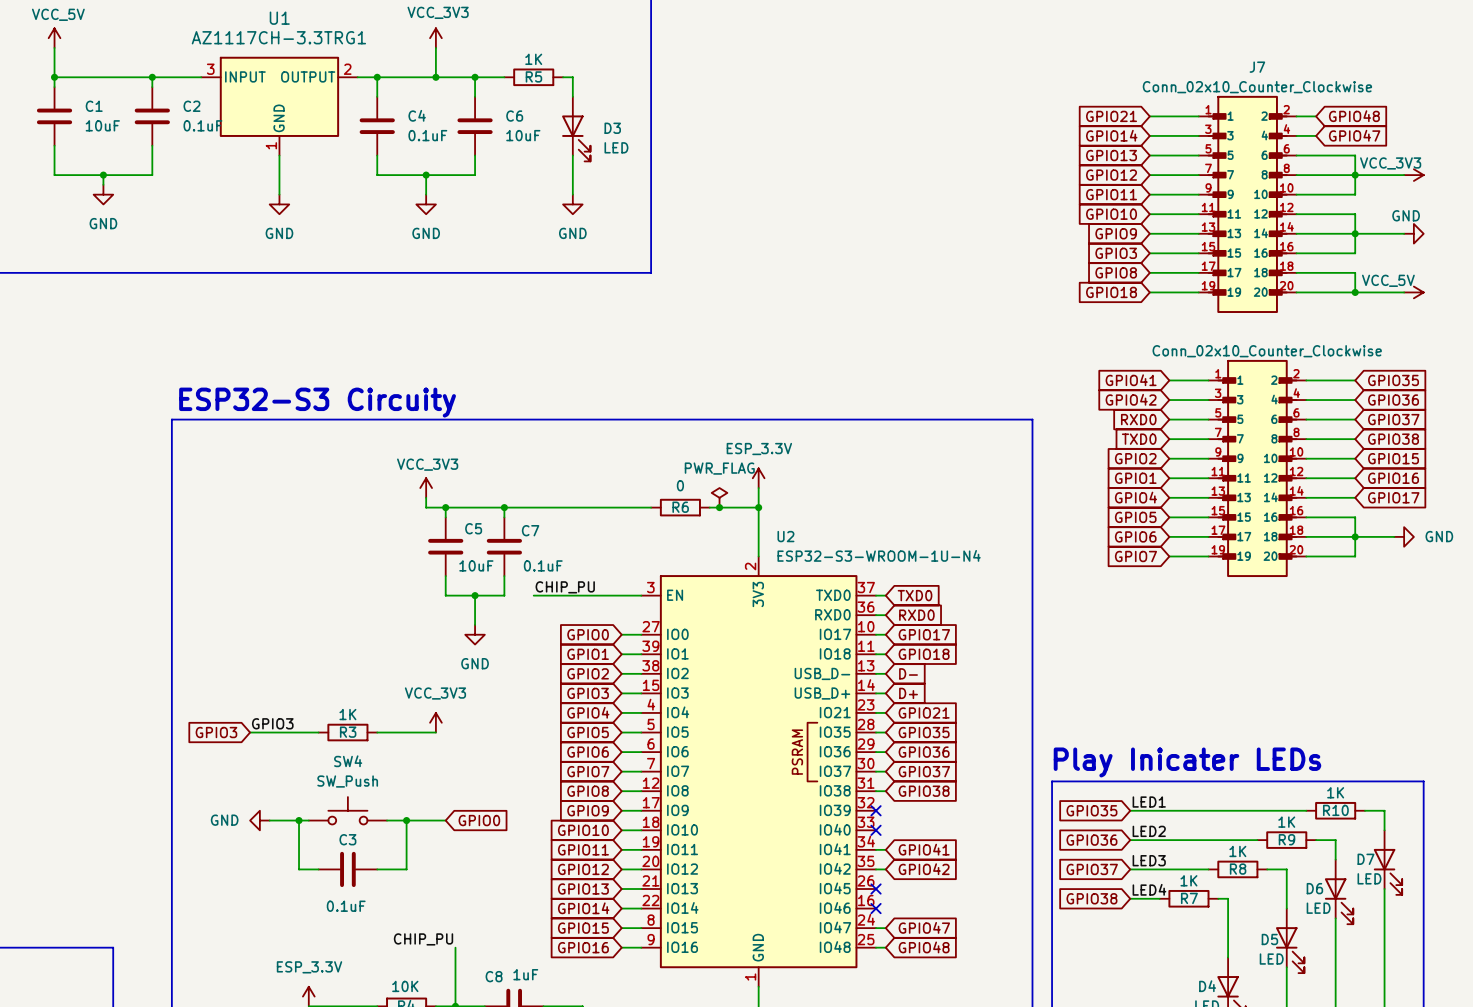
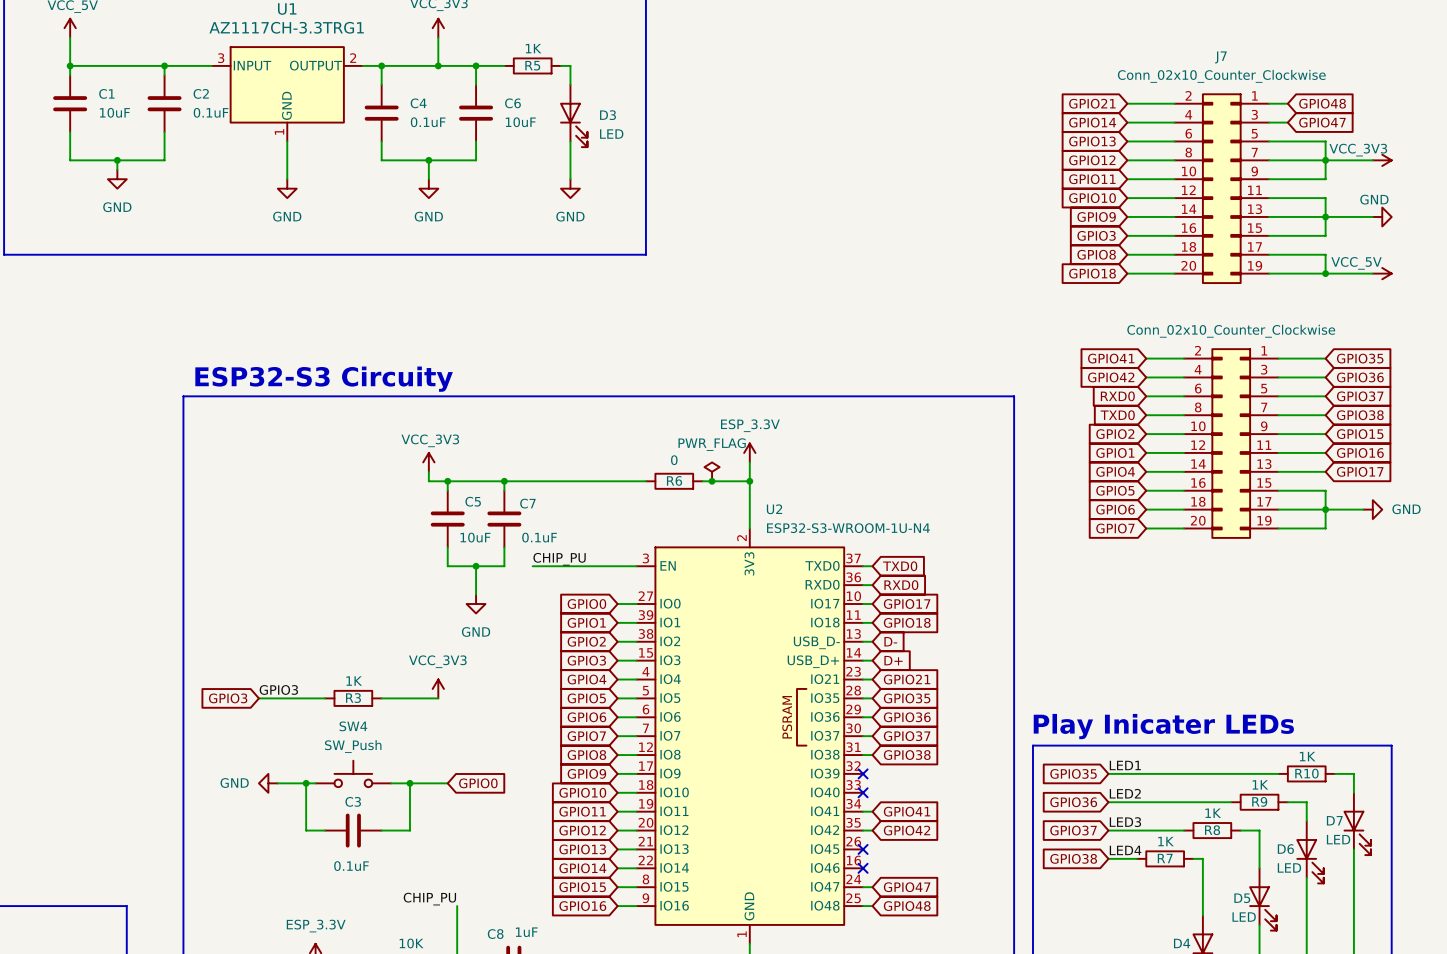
J7 symbol: [1198, 95, 1297, 313] -> [1174, 93, 1269, 285]
part symbol: [1208, 359, 1307, 578] -> [1184, 348, 1279, 539]

